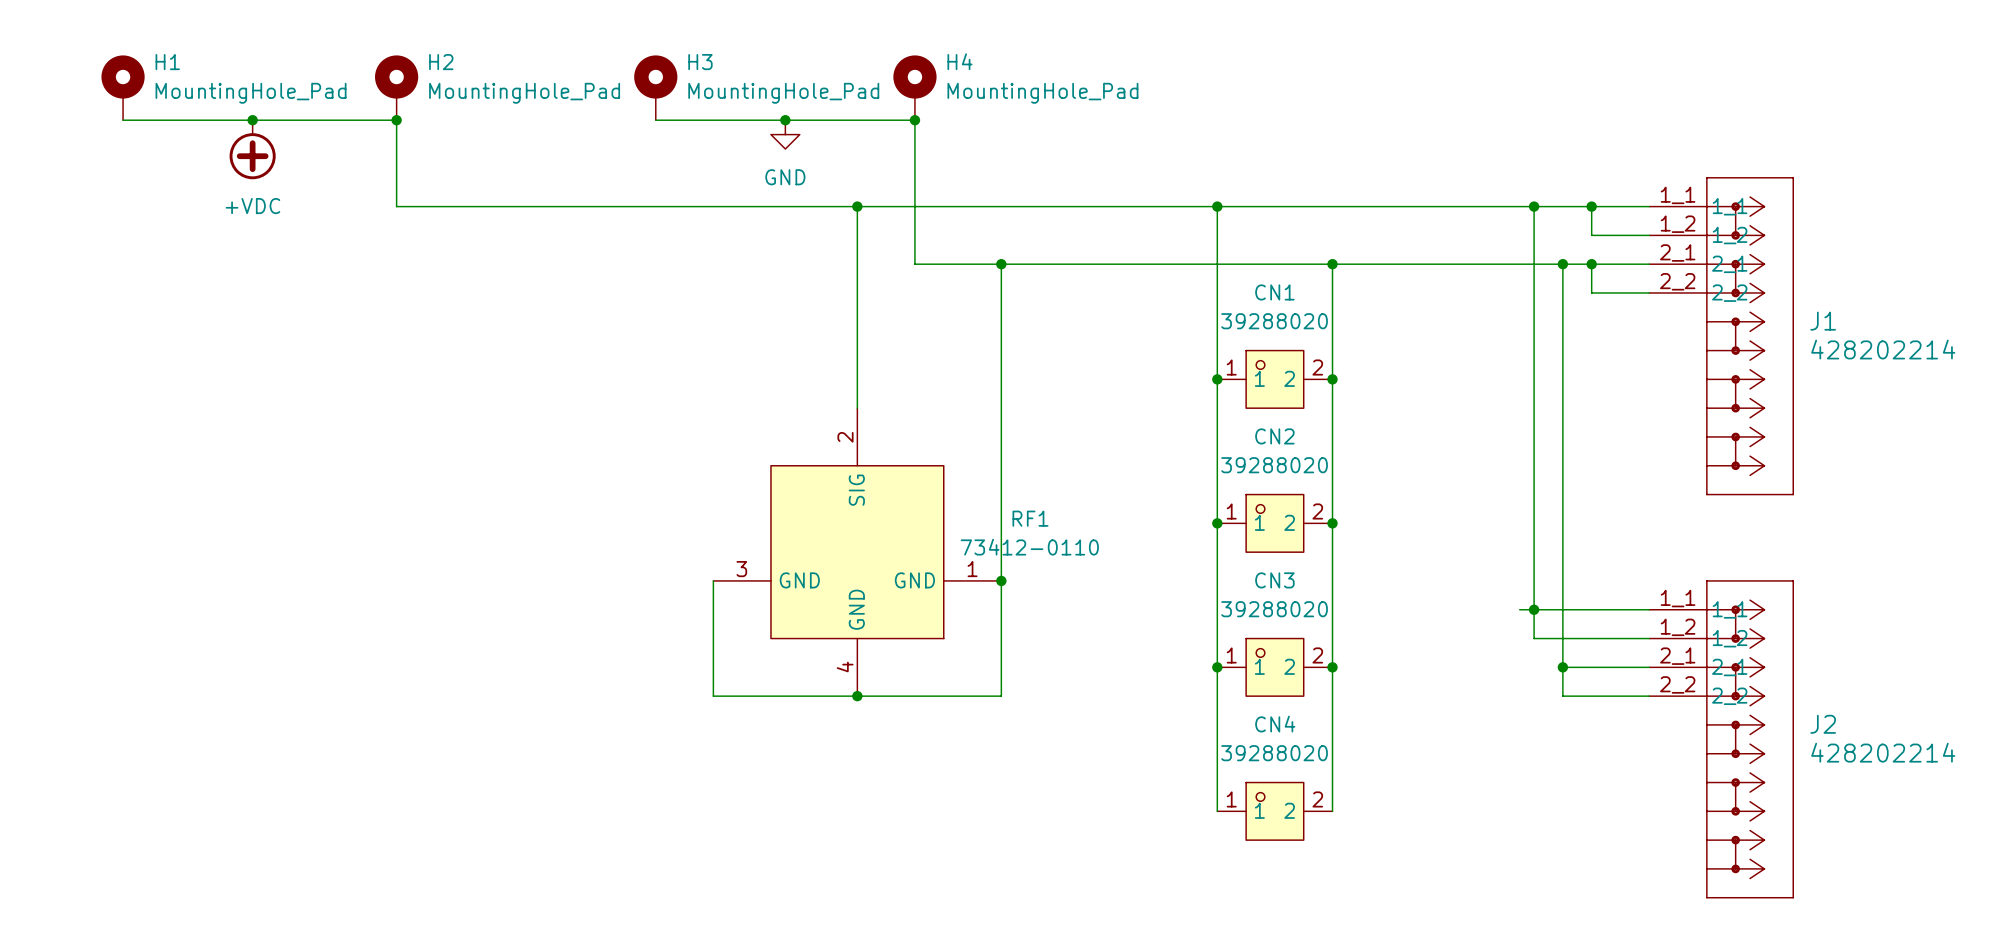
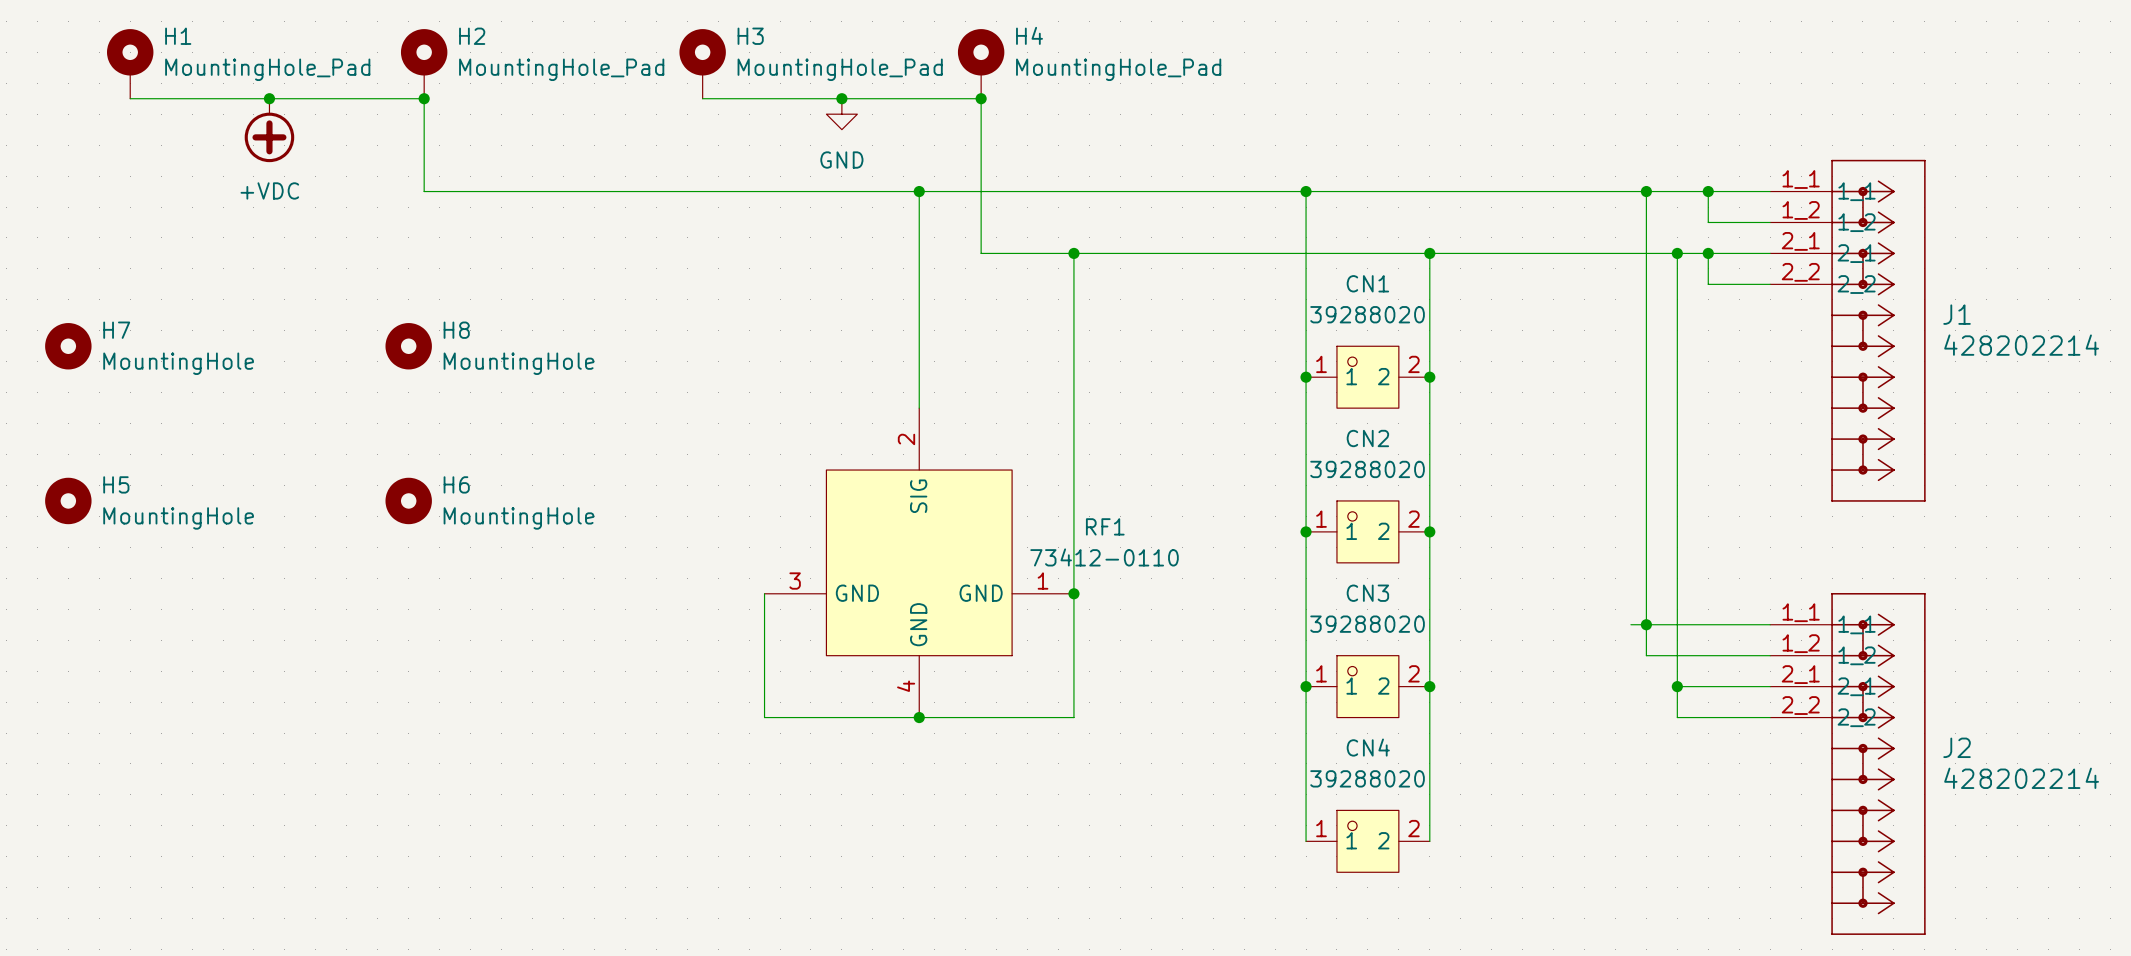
H7: none -> MountingHole (68, 346)
H8: none -> MountingHole (408, 346)
H5: none -> MountingHole (68, 500)
H6: none -> MountingHole (408, 500)

